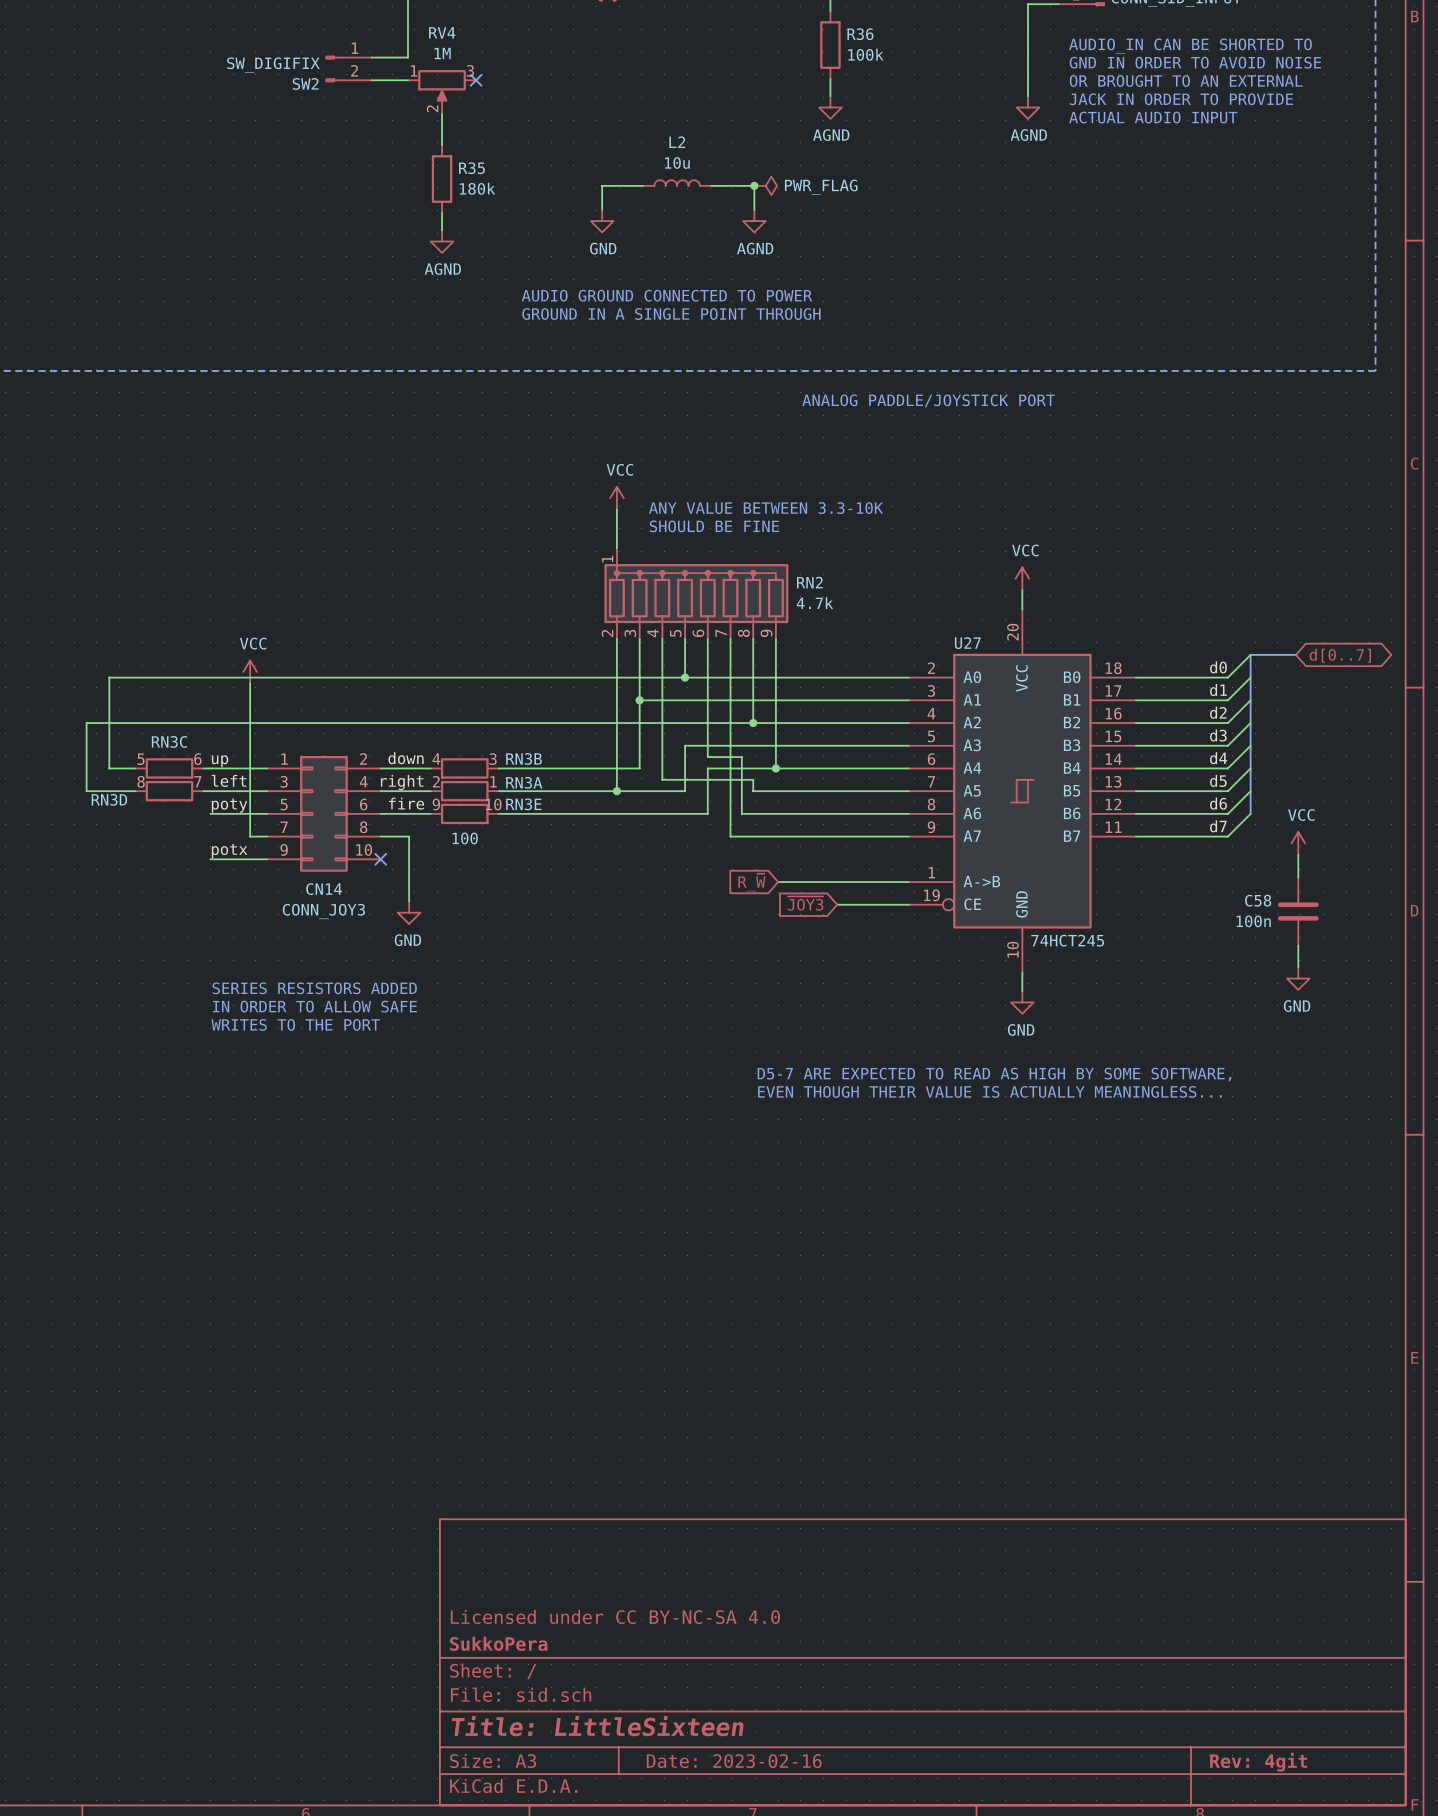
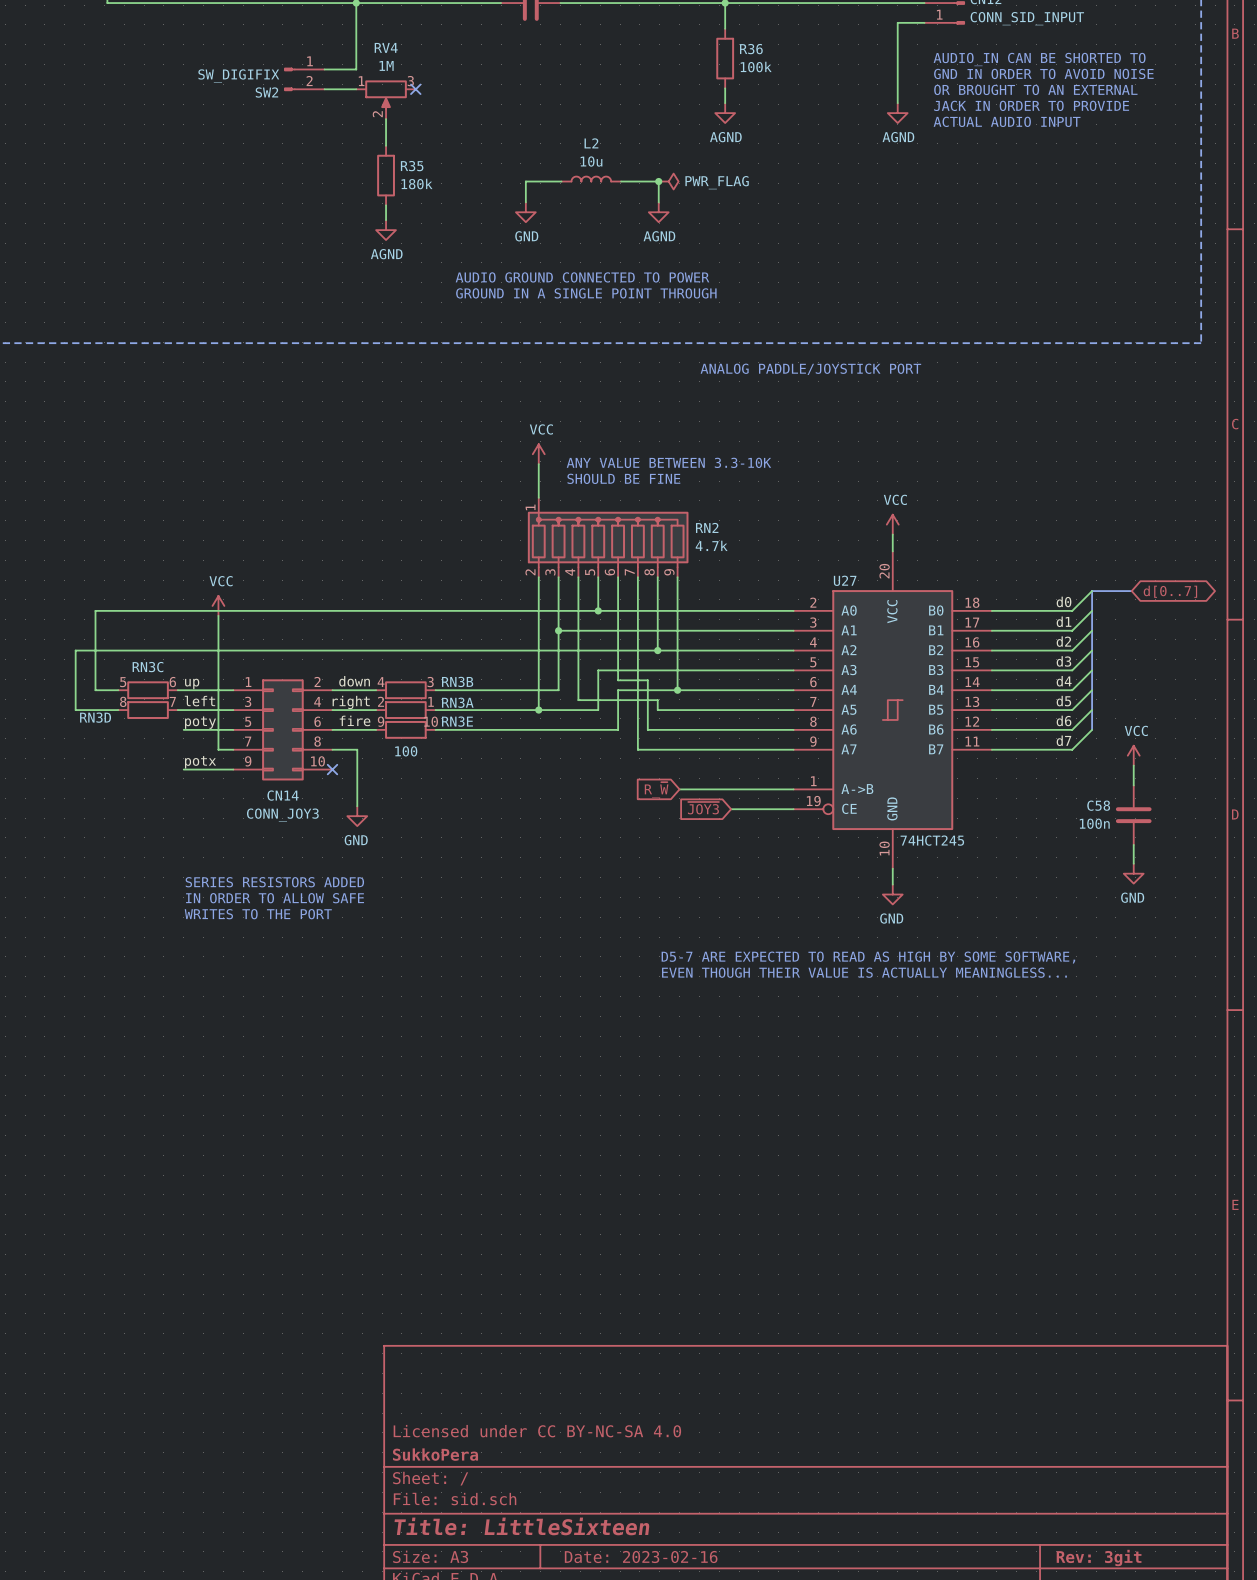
title block: Rev: 4git (1258, 1762) -> Rev: 3git (1099, 1557)

